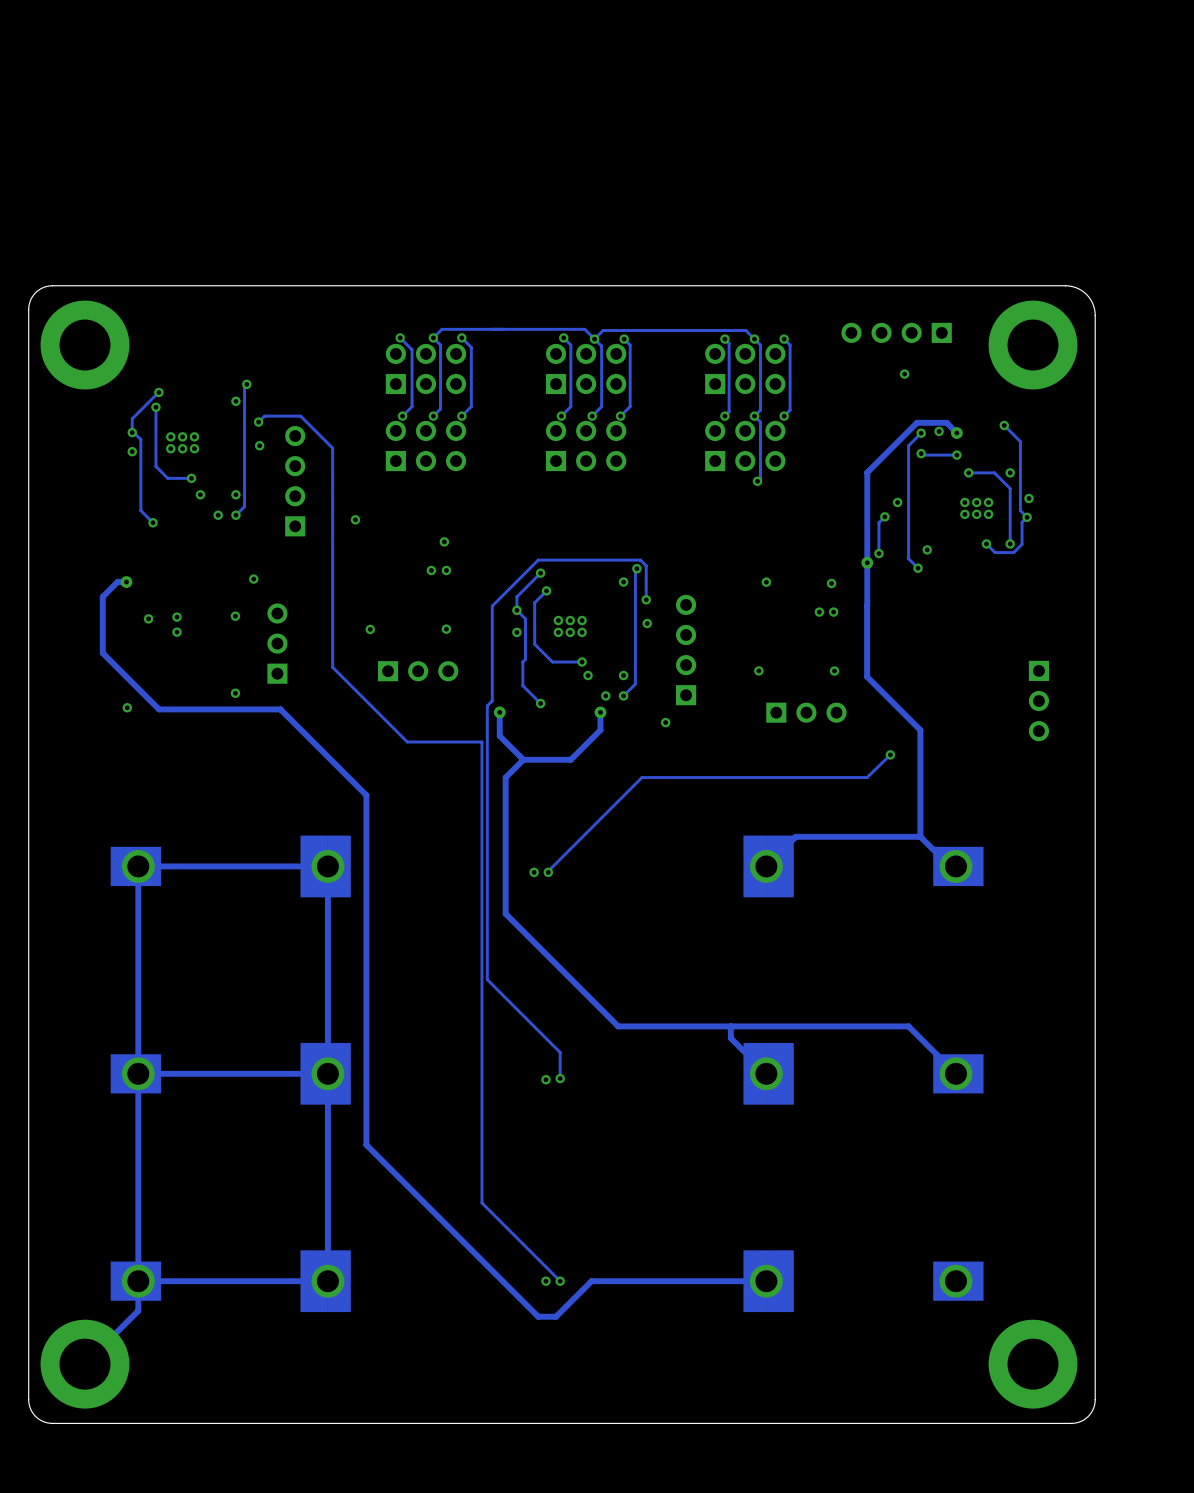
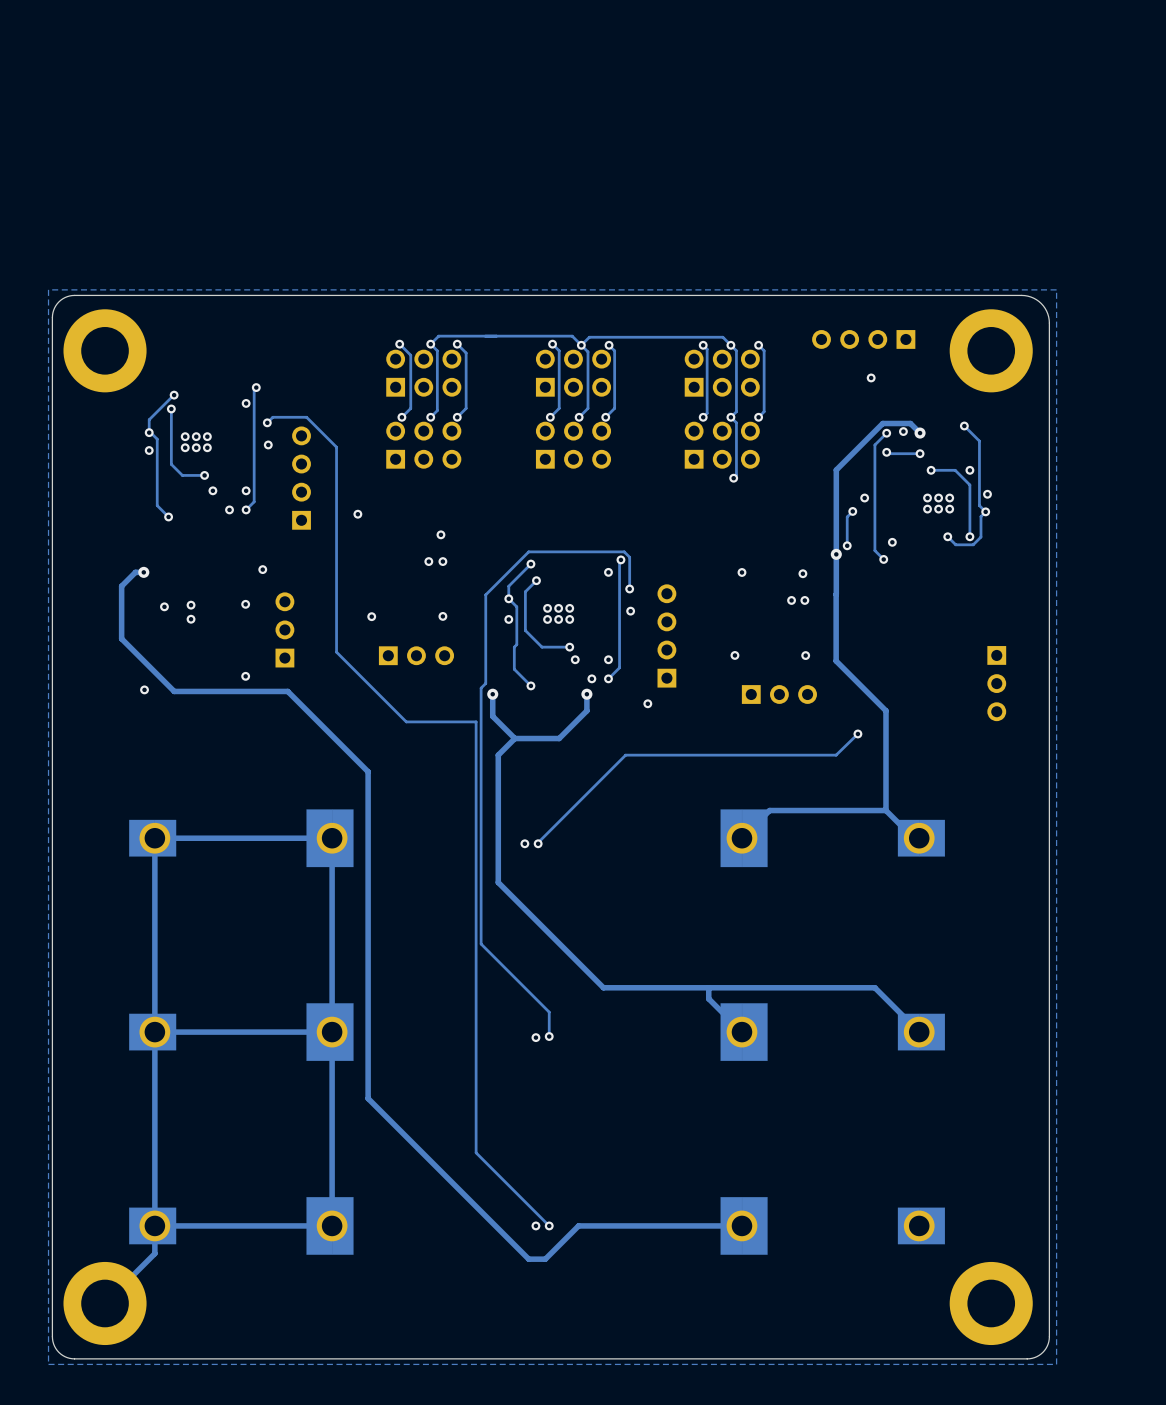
zone outline: none -> (1056, 289) (1056, 1364) (48, 1364) (48, 289) (1056, 289)

